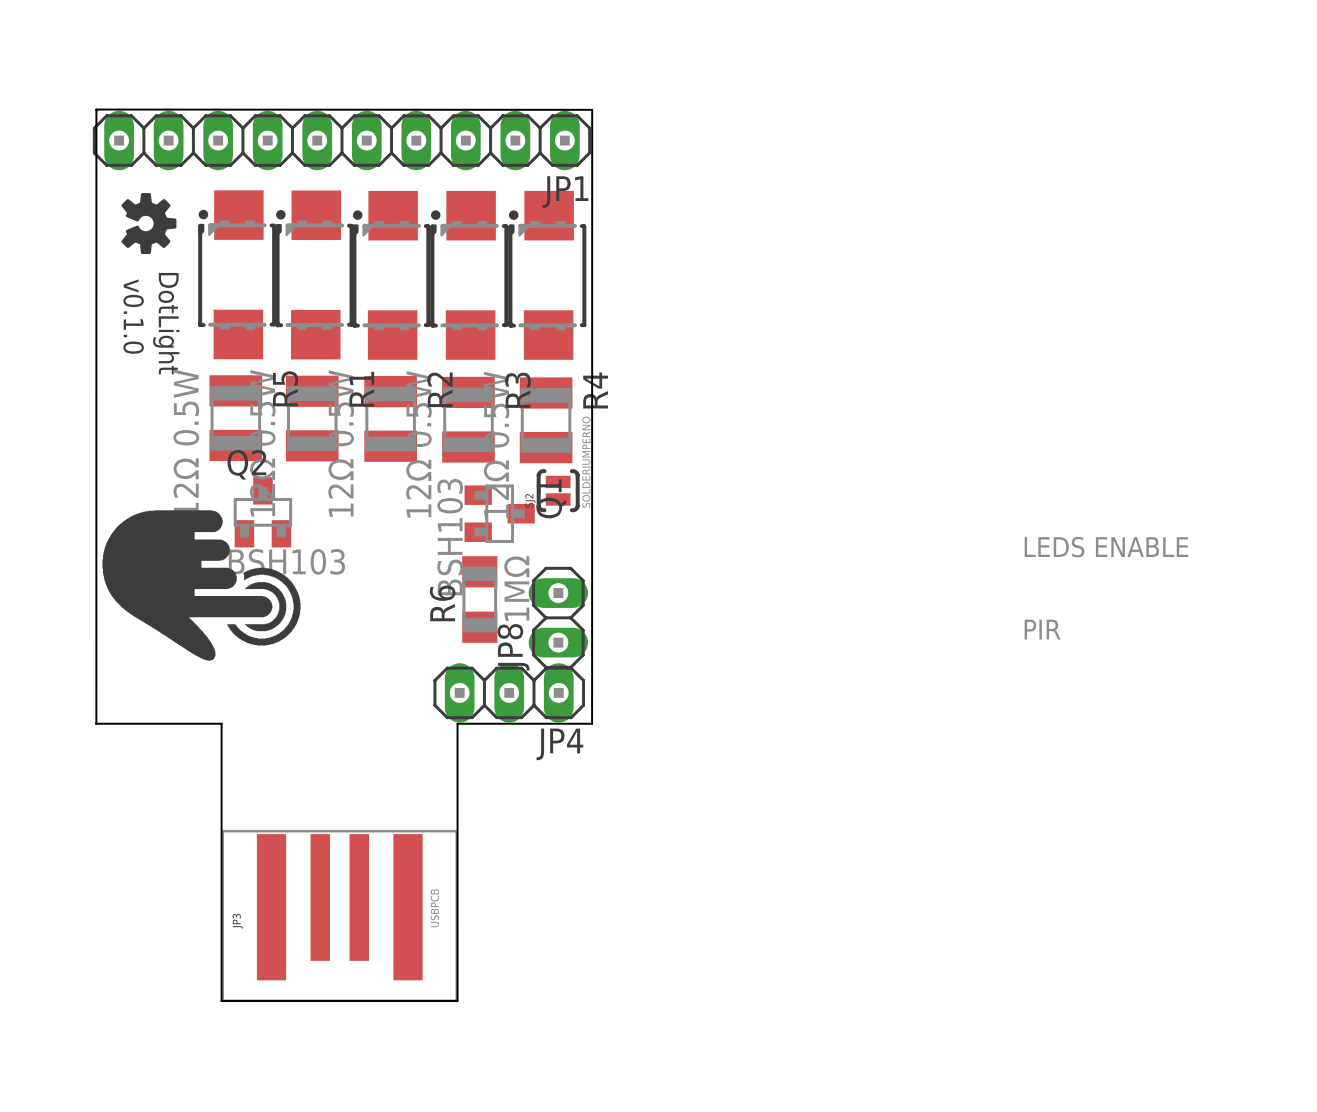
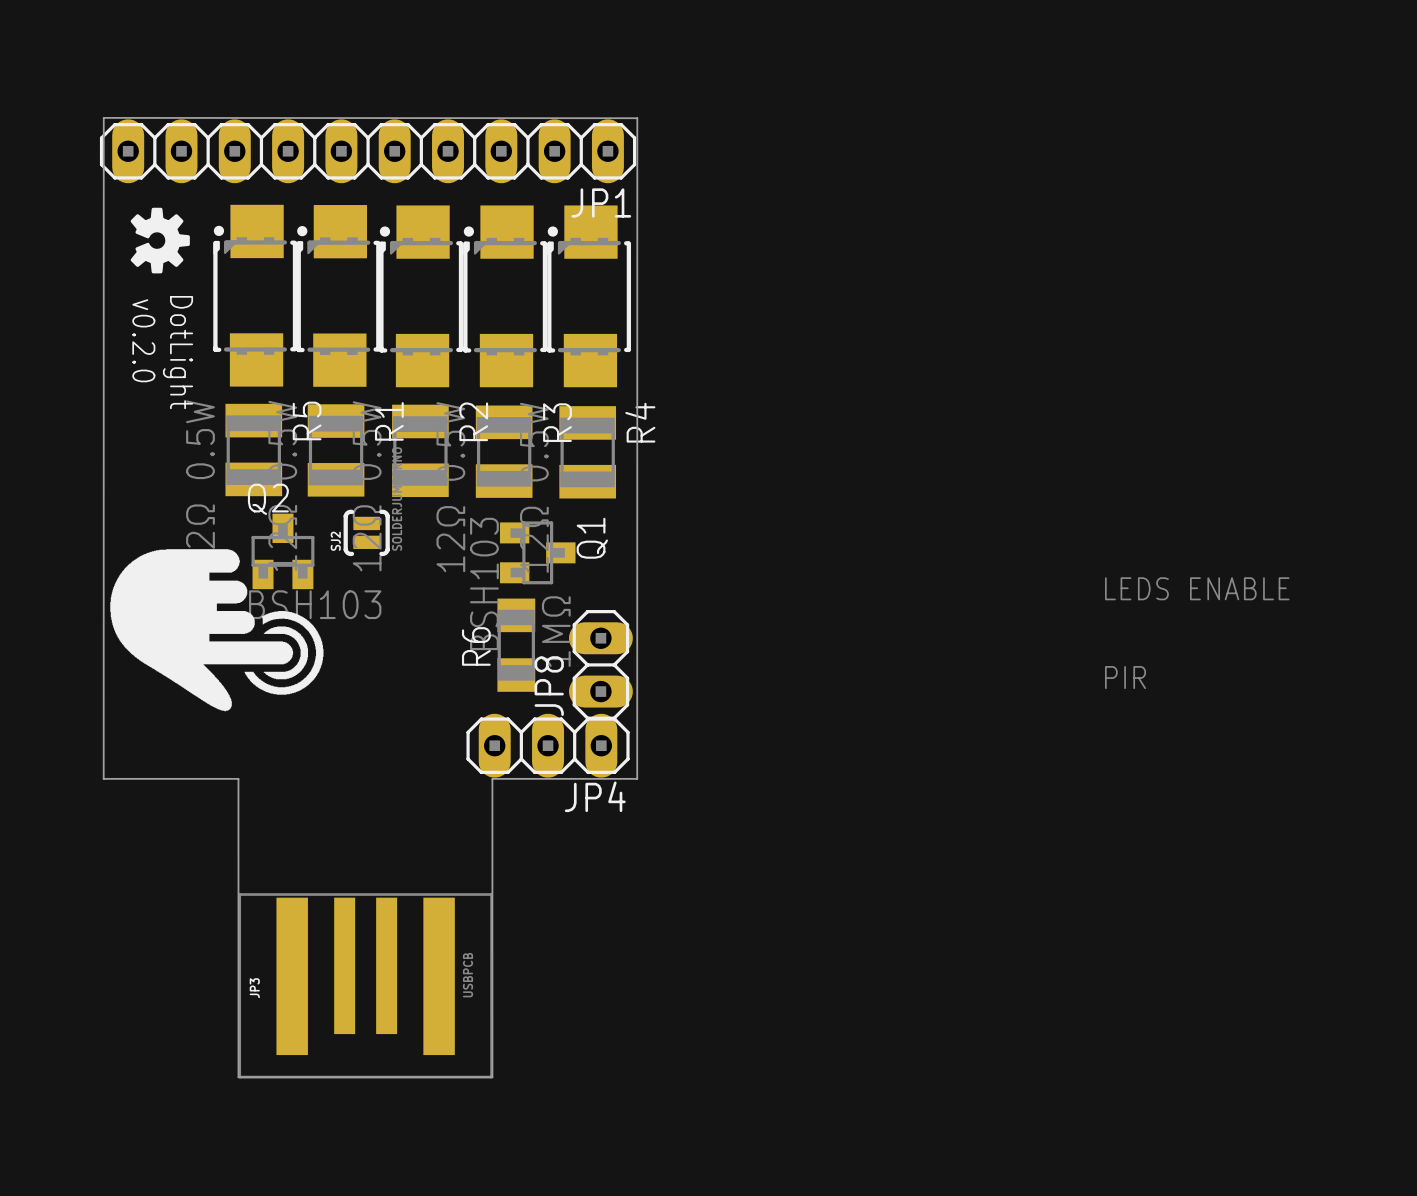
text: v0.1.0 (133, 316) -> v0.2.0 (143, 340)
SJ2 position: (558, 490) -> (366, 532)

